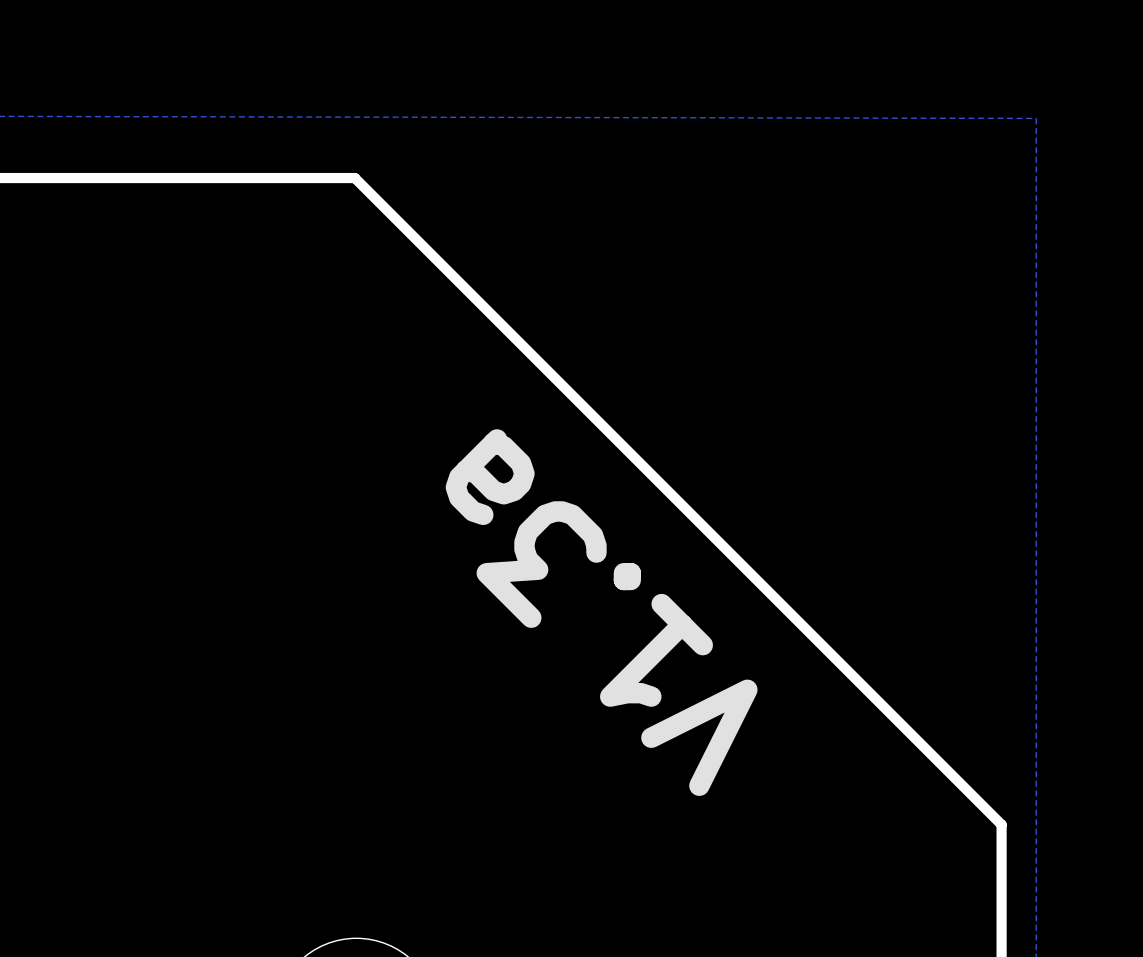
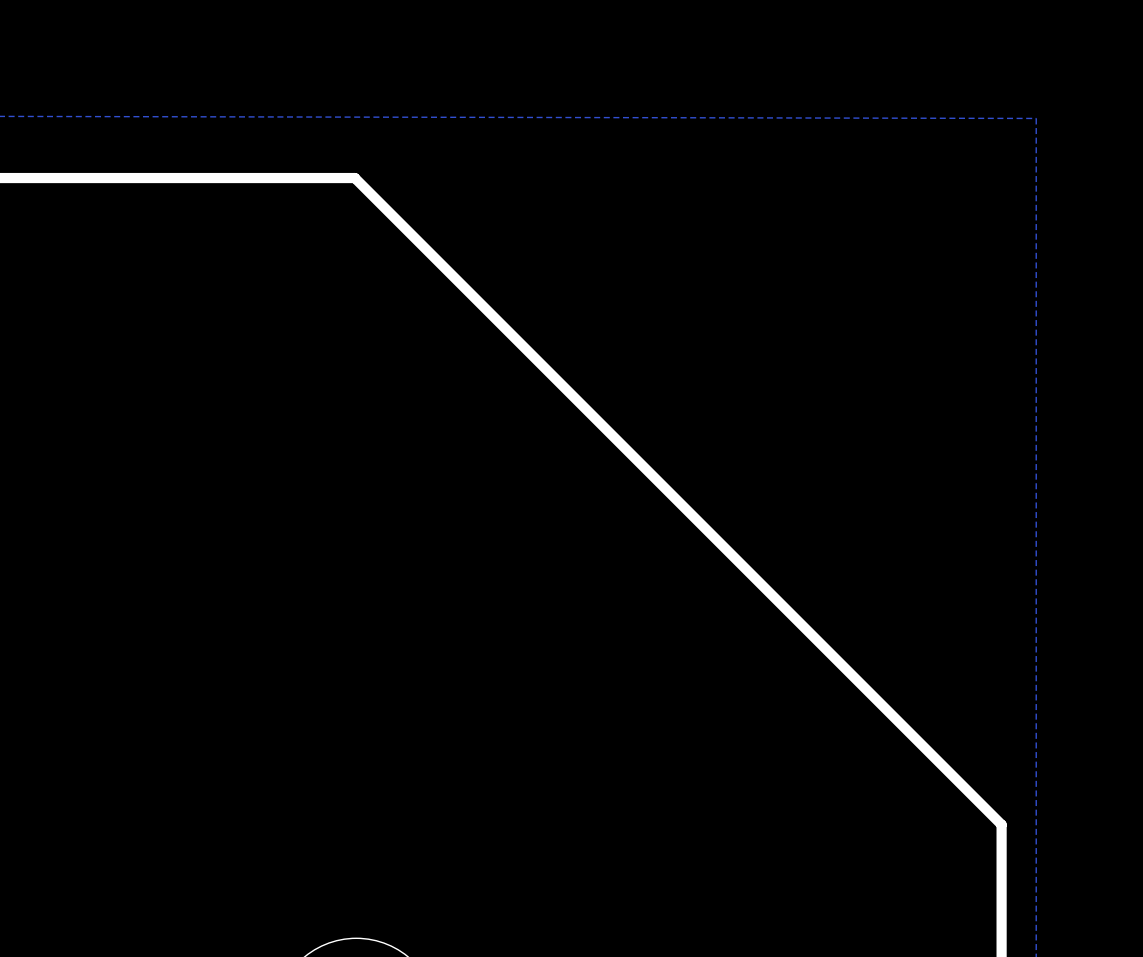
text: V1.3a (601, 612) -> none

